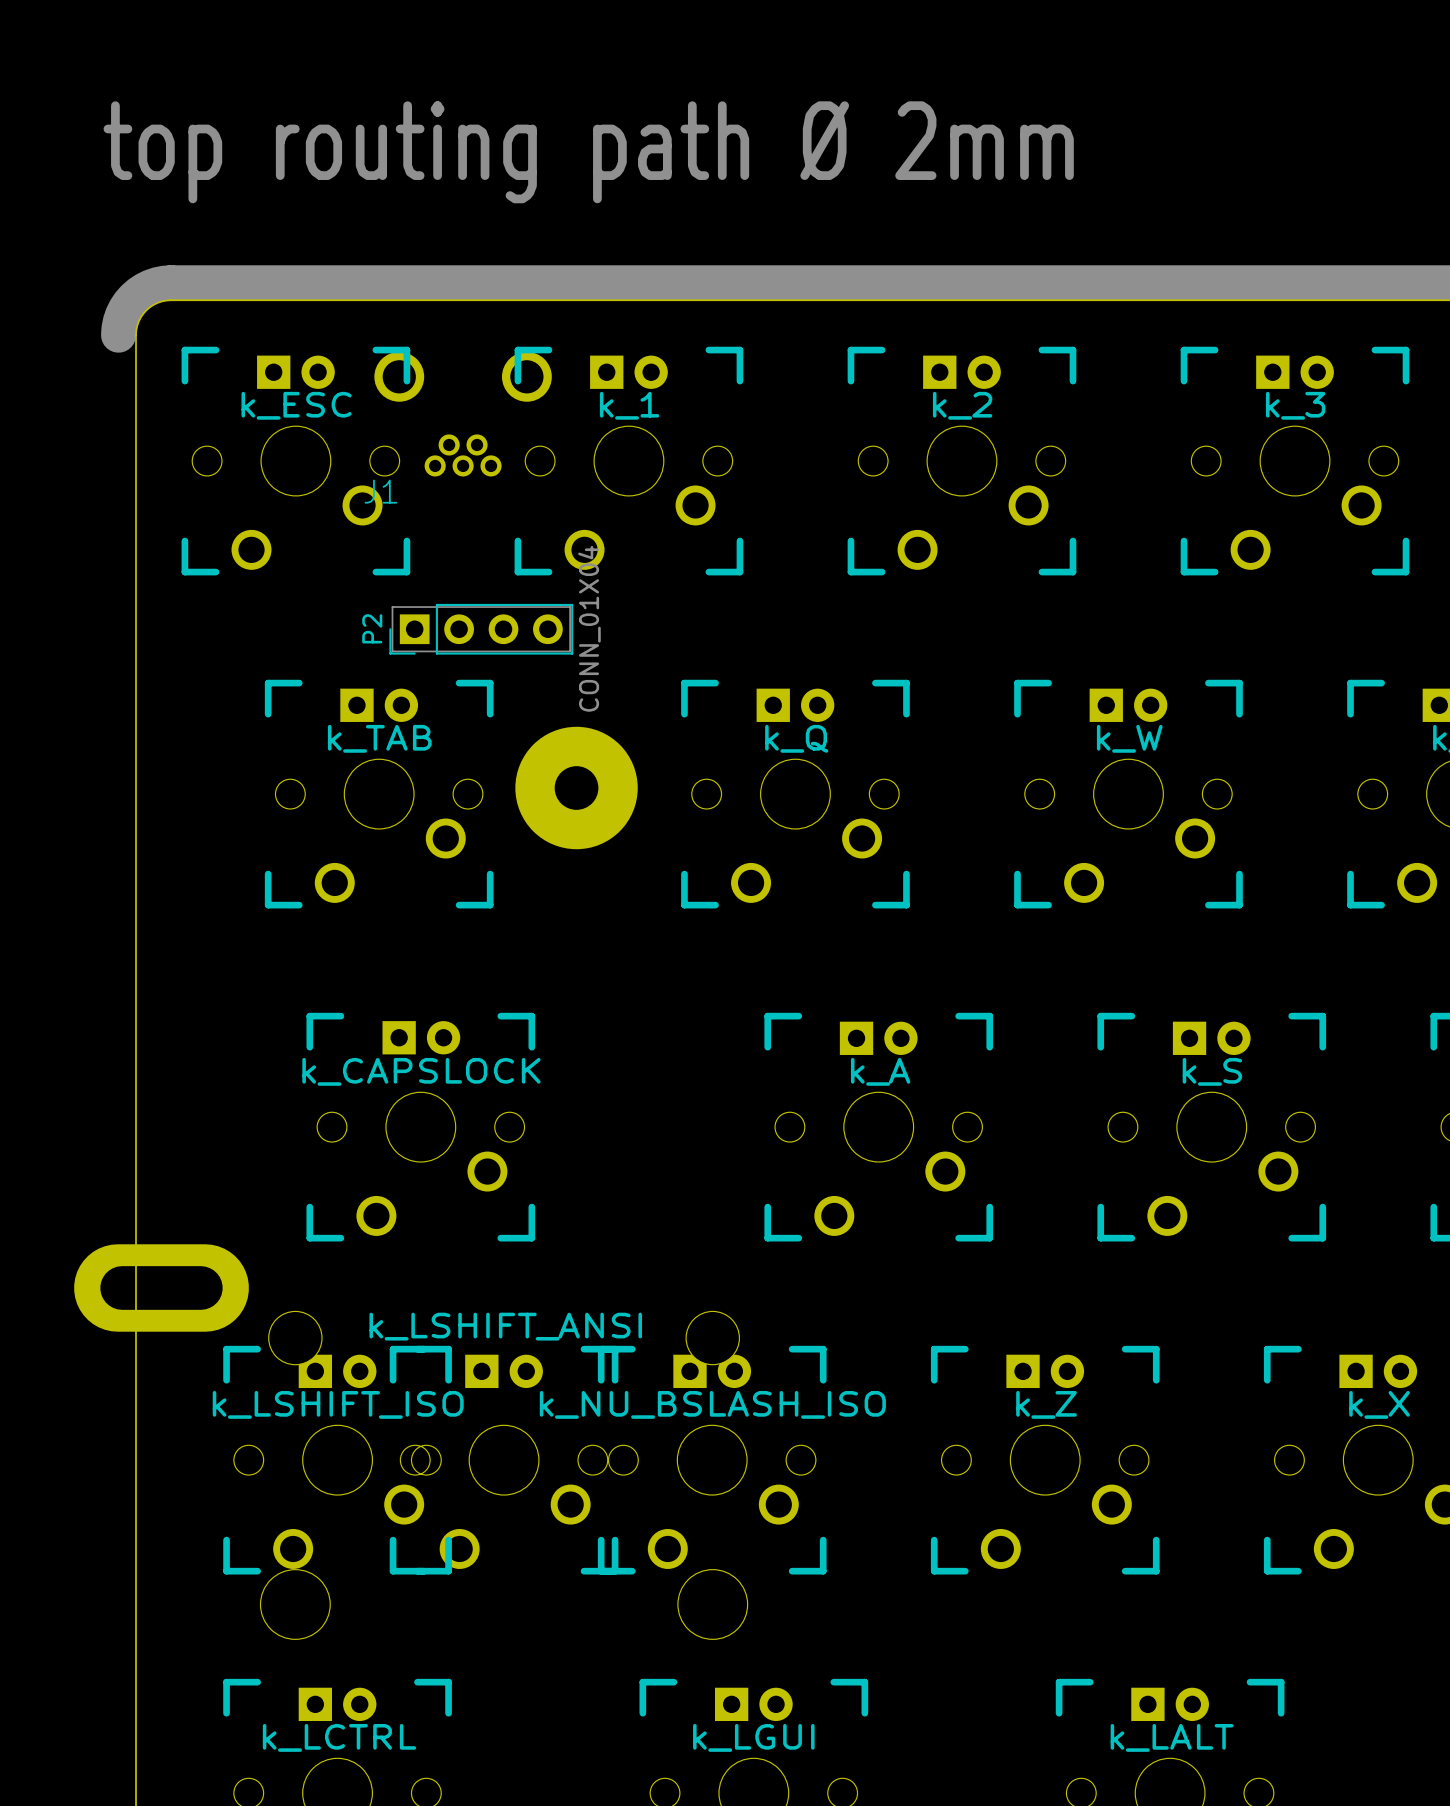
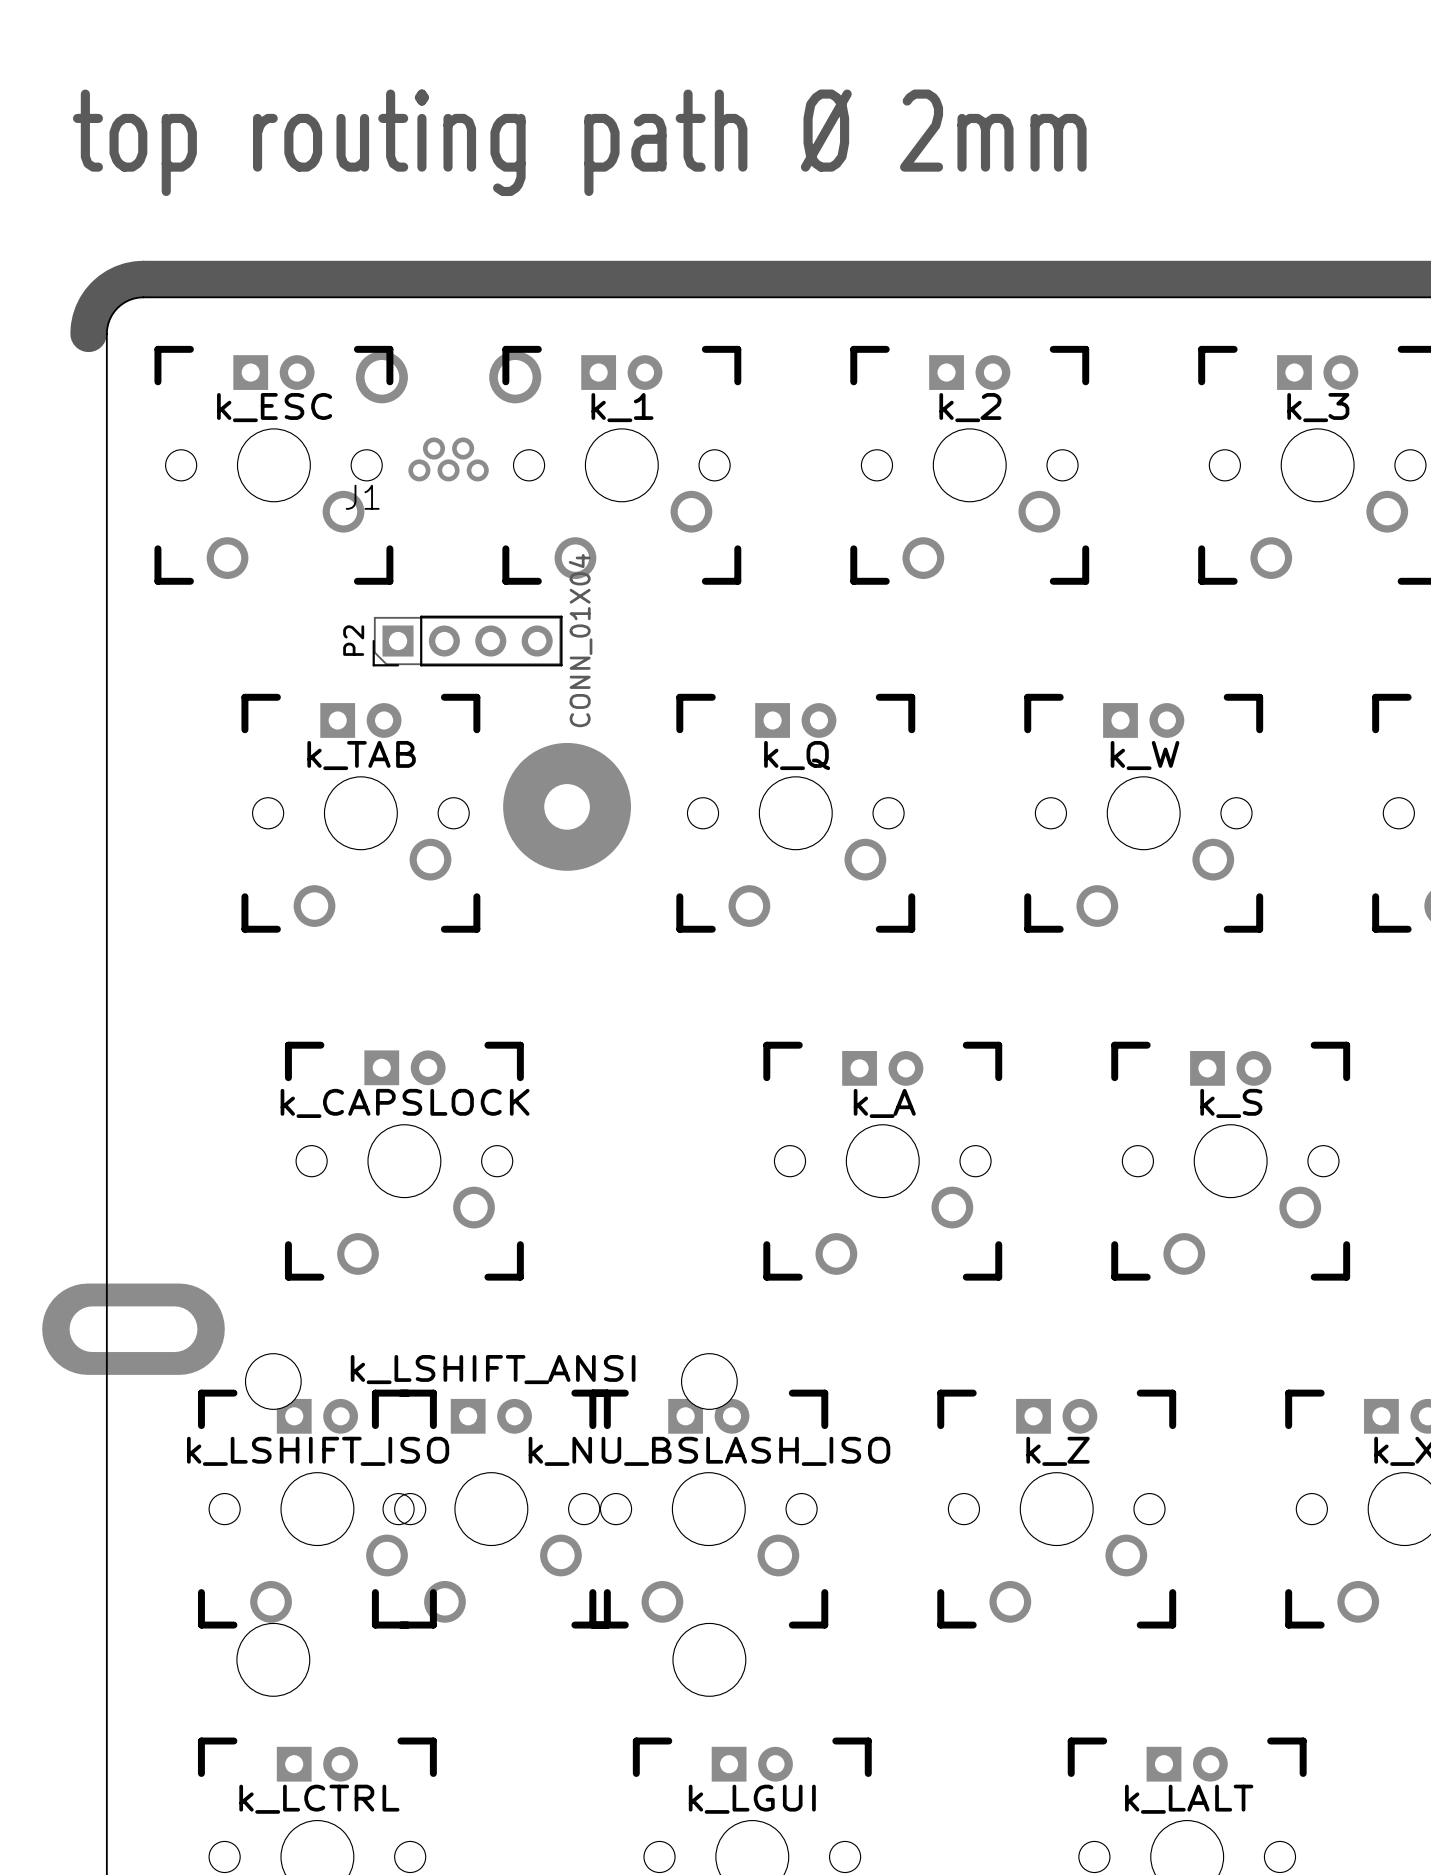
P2 footprint: [389, 603, 574, 655] -> [372, 615, 563, 667]

